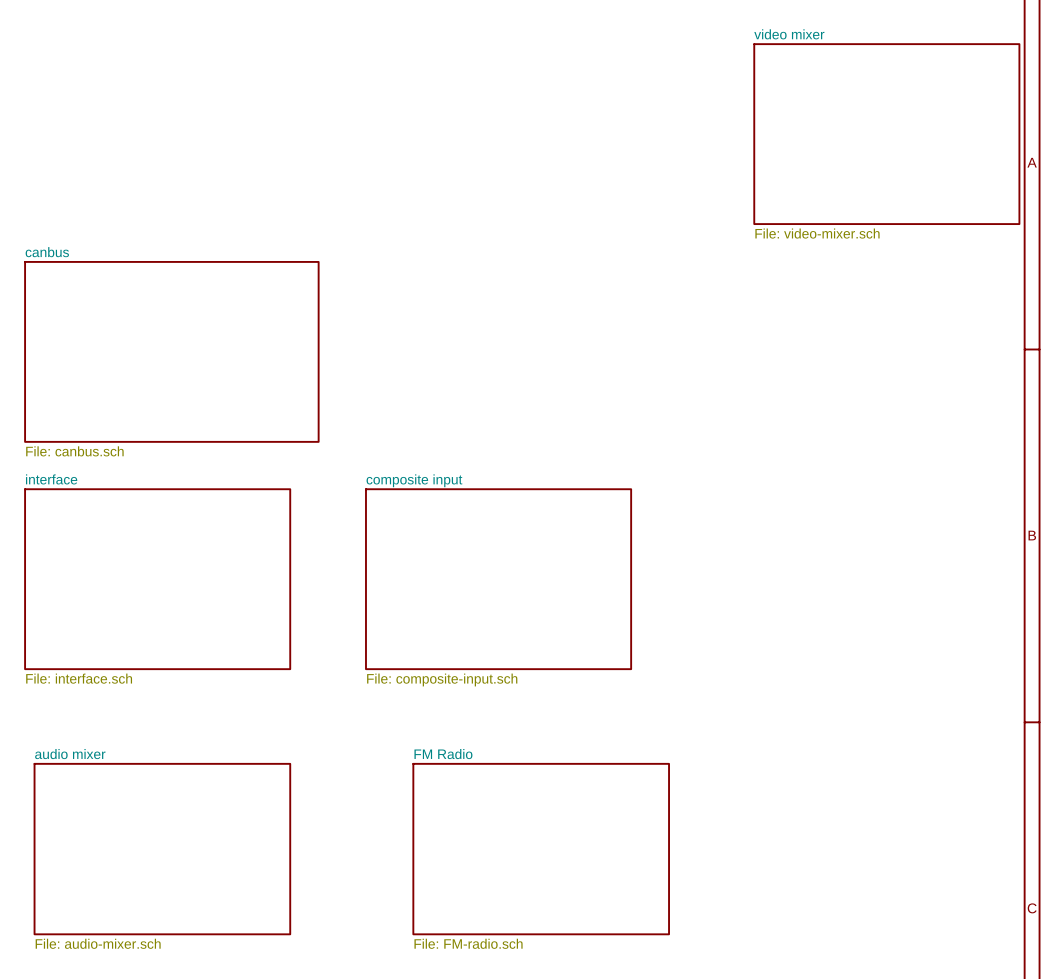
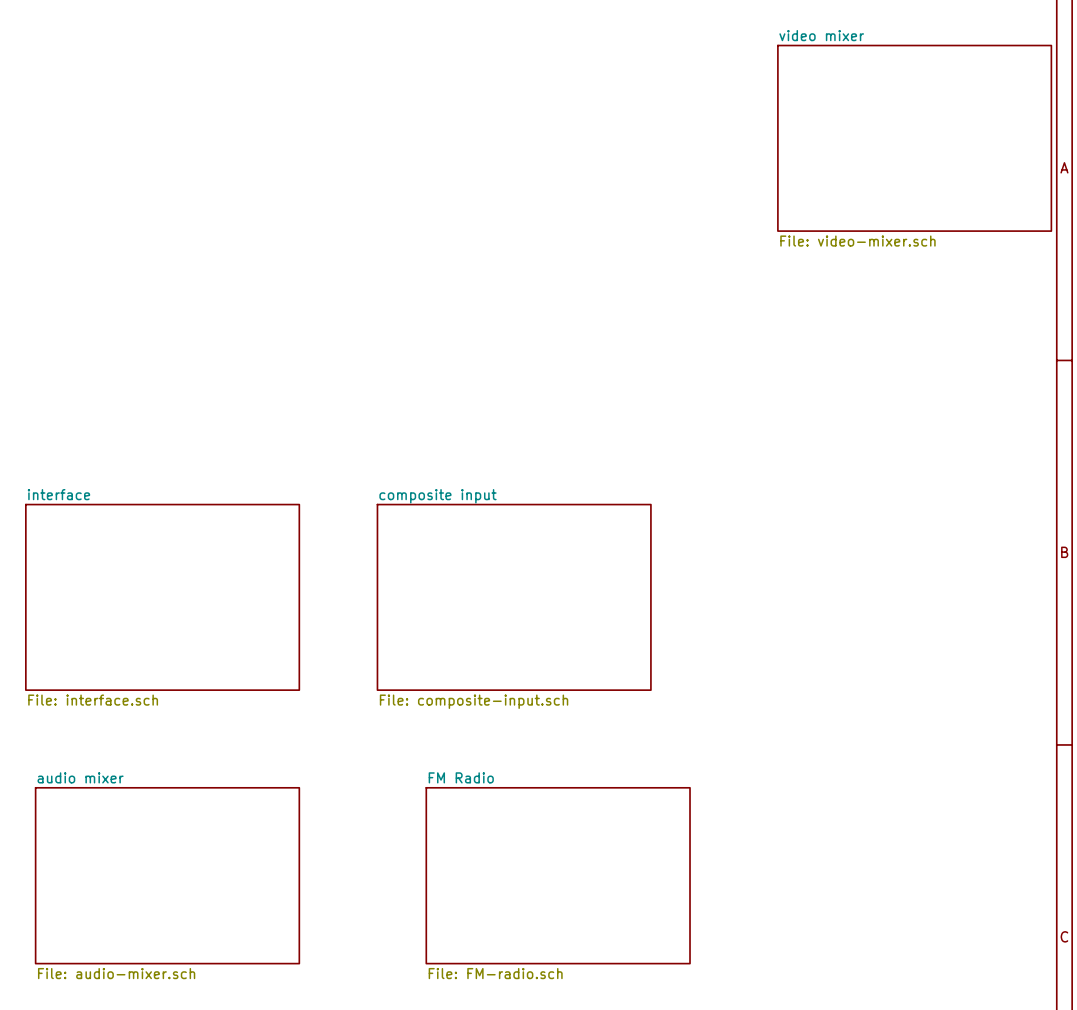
sheet canbus: File: canbus.sch (171, 351) -> none

